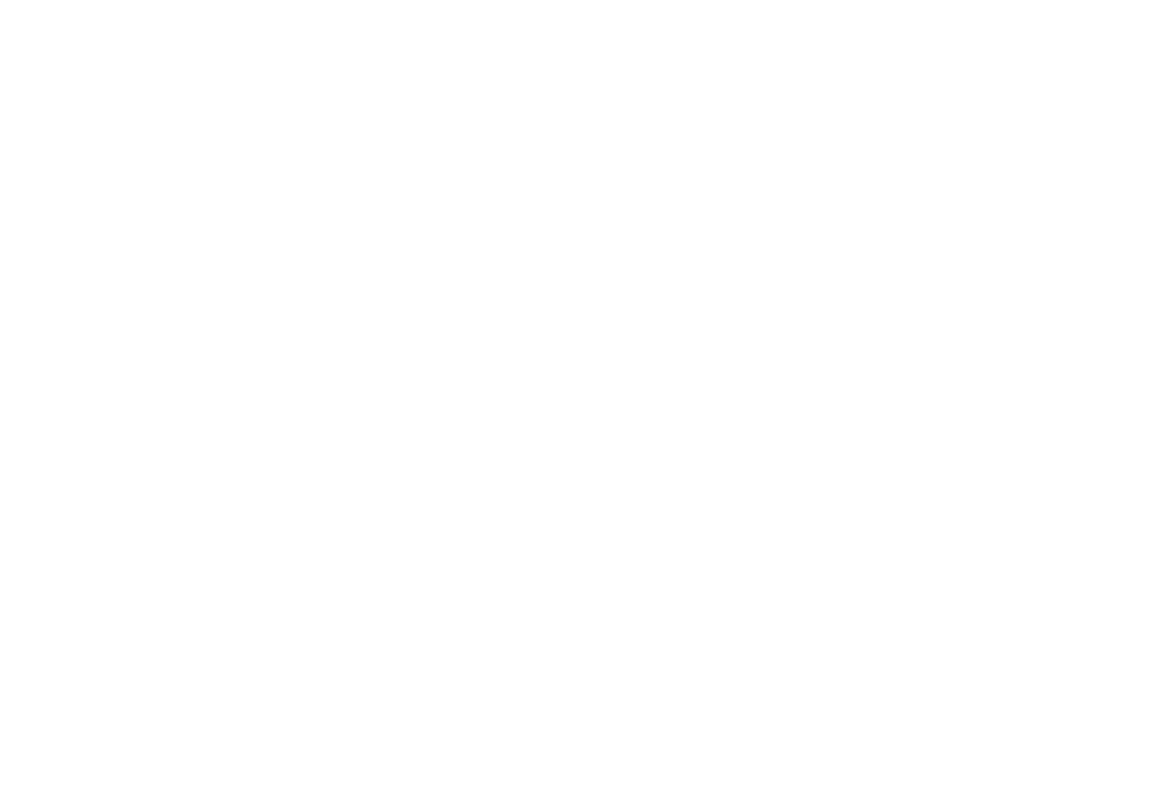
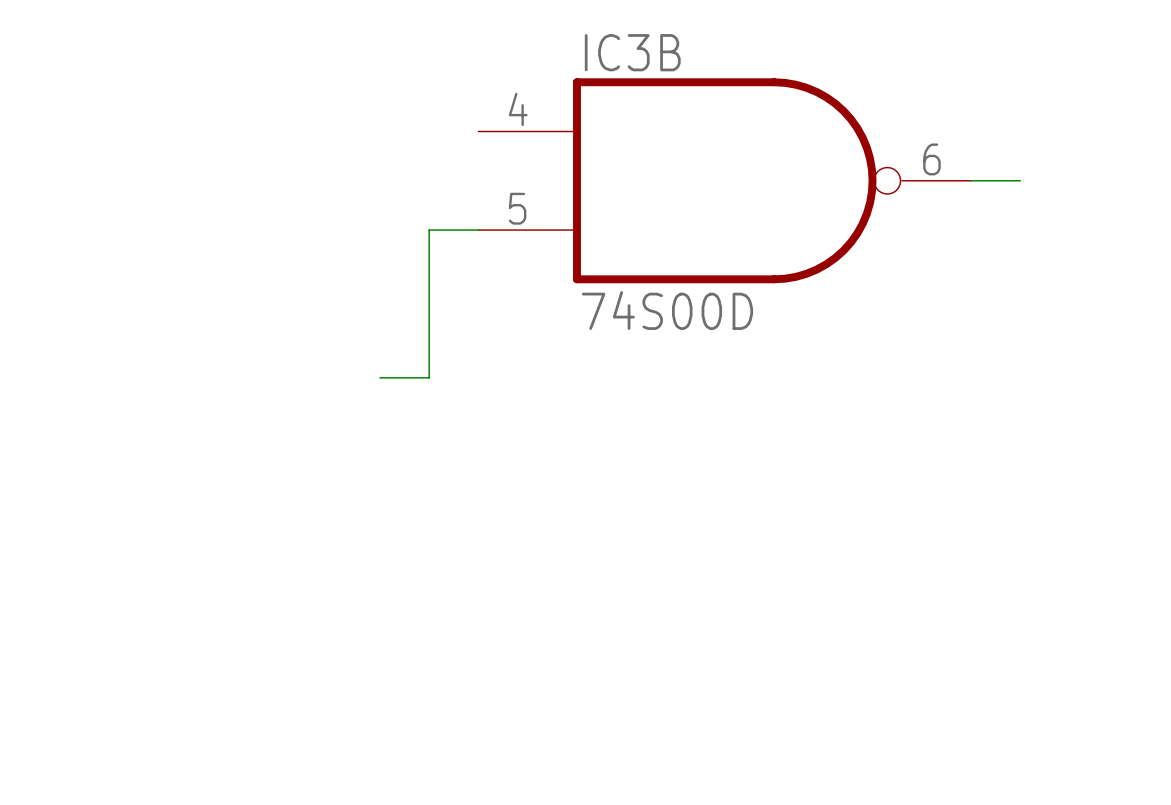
IC3B: none -> 74S00D (724, 180)
wire: none -> (971, 180) (1020, 180)
wire: none -> (478, 230) (429, 230) (429, 377) (379, 377)

